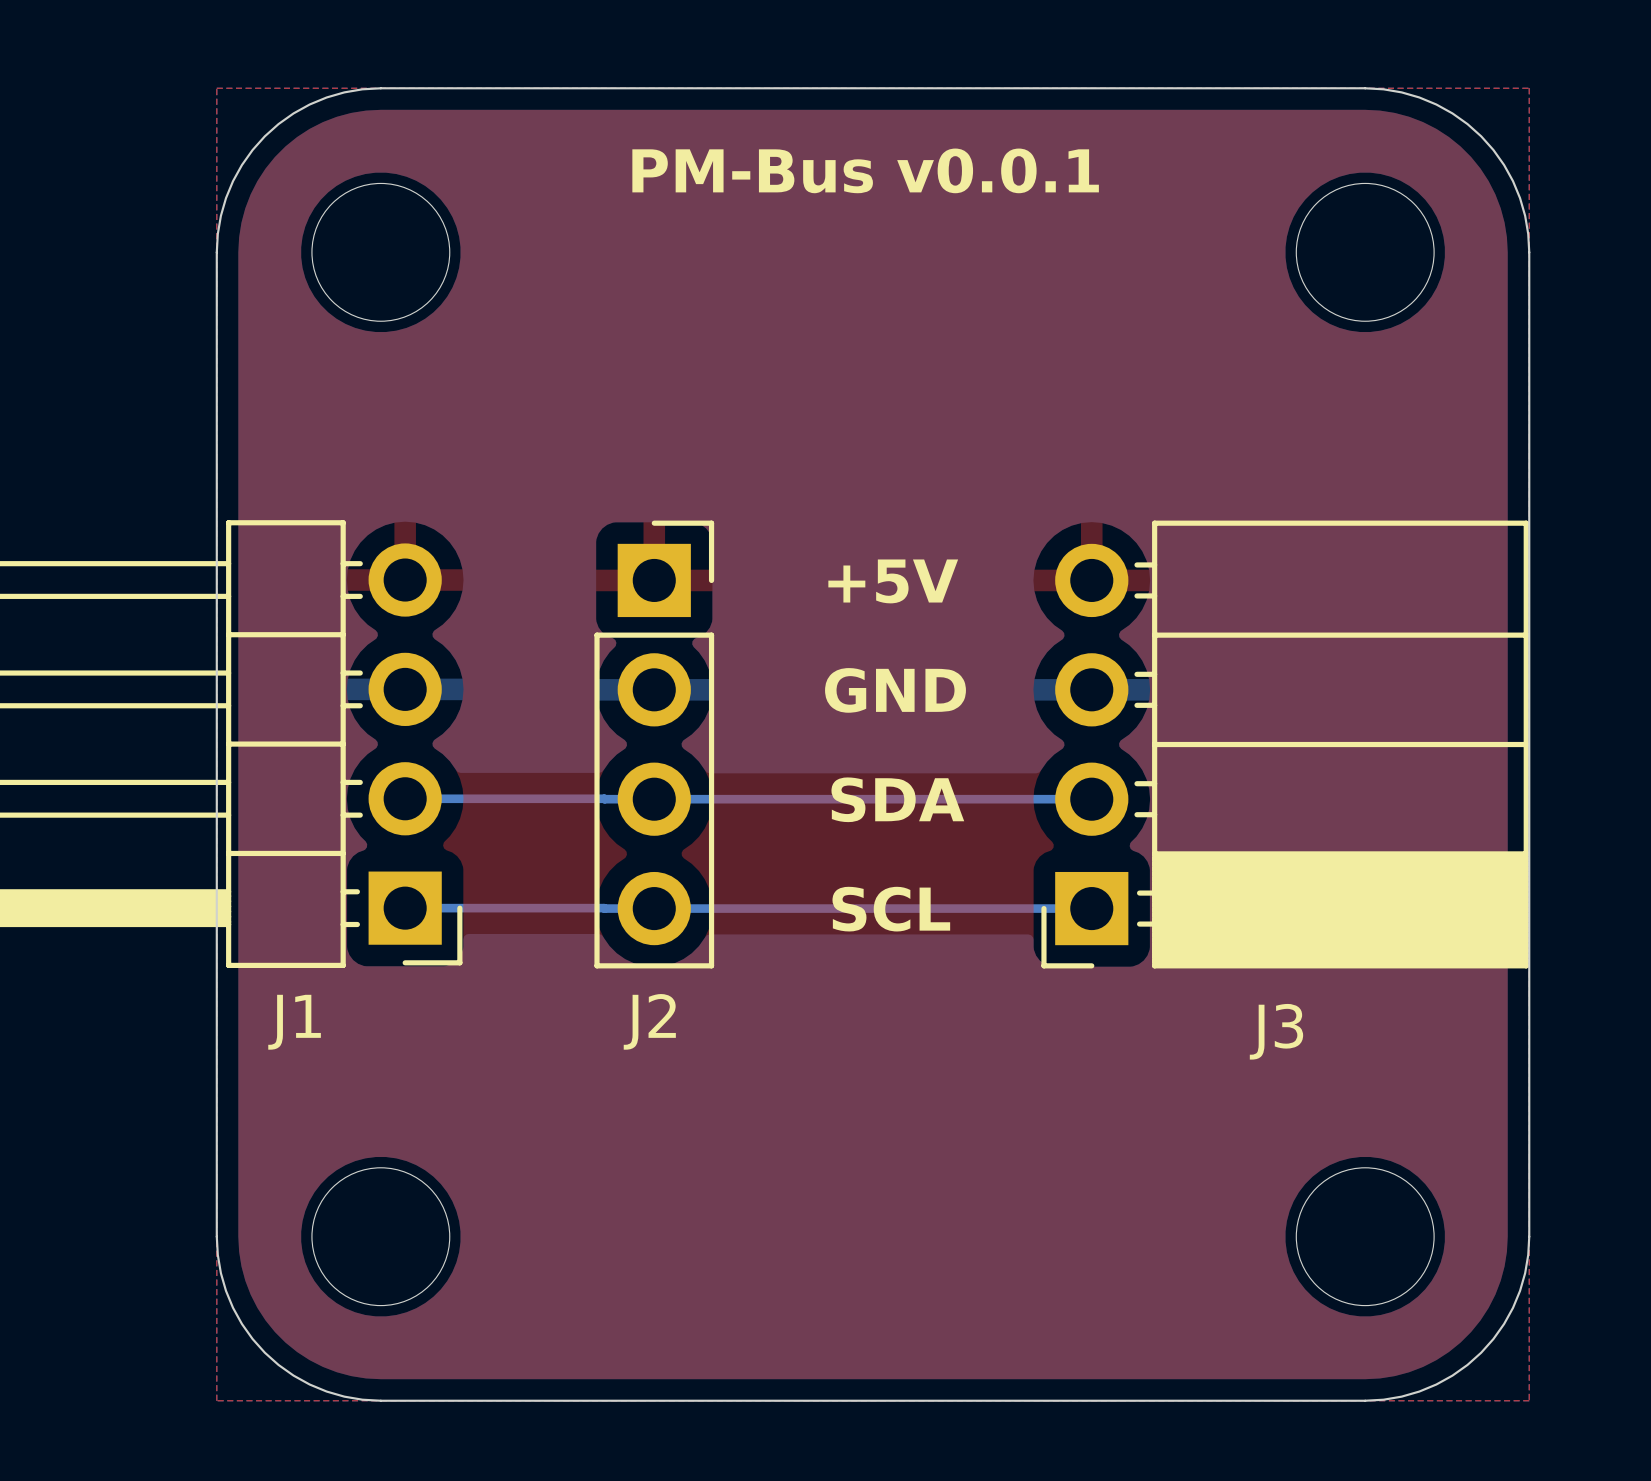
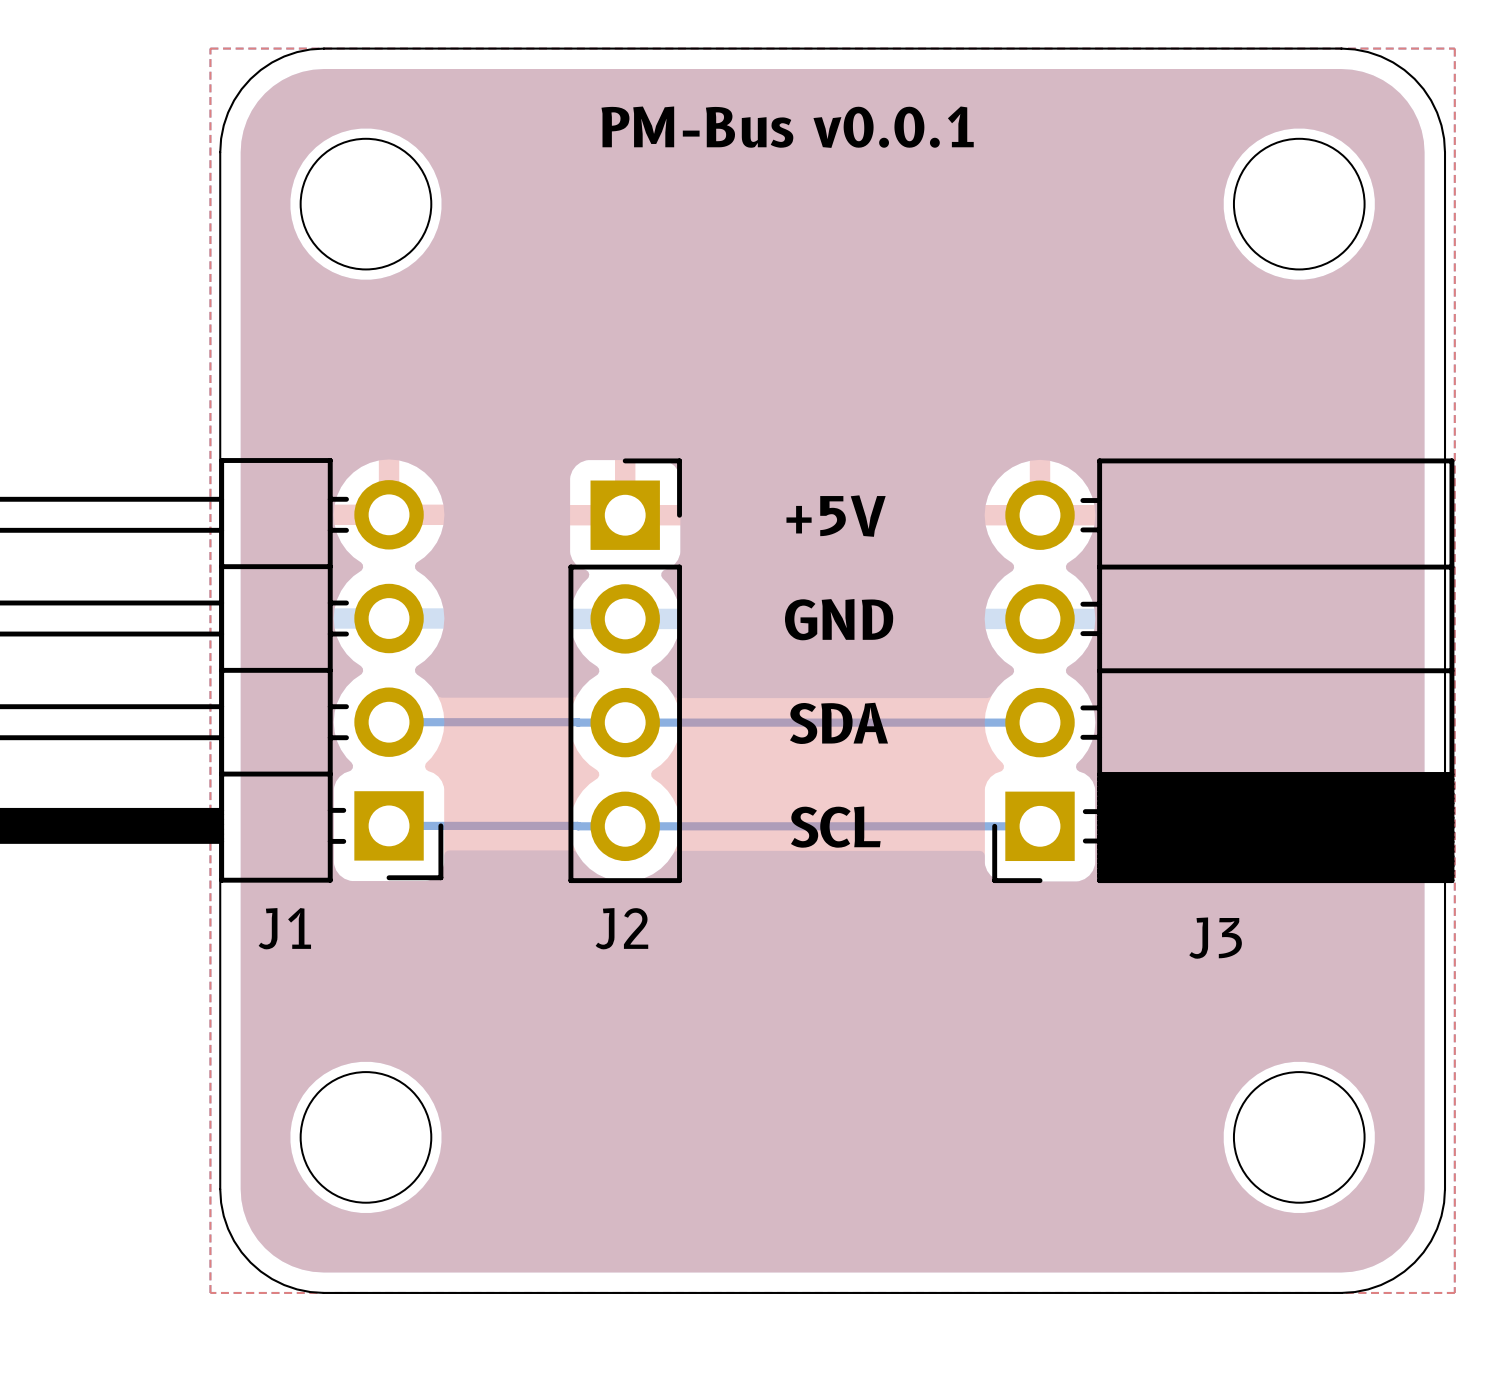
board edge: (380, 88) (344, 92) (309, 104) (278, 124) (264, 136) (241, 165) (226, 198) (217, 233) (216, 252) (217, 1255) (226, 1290) (241, 1323) (252, 1338) (278, 1364) (293, 1375) (326, 1391) (362, 1399) (380, 1400) -> (365, 48) (323, 48) (297, 52) (284, 56) (260, 70) (250, 78) (234, 100) (223, 125) (220, 152) (221, 1202) (223, 1216) (234, 1241) (250, 1262) (272, 1279) (284, 1285) (310, 1292) (365, 1292)
board edge: (1365, 88) (1401, 92) (1436, 104) (1467, 124) (1481, 136) (1493, 150) (1513, 181) (1525, 215) (1529, 252) (1528, 1255) (1520, 1290) (1513, 1307) (1493, 1338) (1467, 1364) (1436, 1384) (1419, 1391) (1401, 1396) (1365, 1400) -> (1299, 48) (1341, 48) (1368, 52) (1380, 56) (1404, 70) (1423, 89) (1437, 112) (1444, 138) (1445, 152) (1444, 1202) (1437, 1228) (1431, 1241) (1414, 1262) (1393, 1279) (1368, 1289) (1354, 1292) (1299, 1292)

